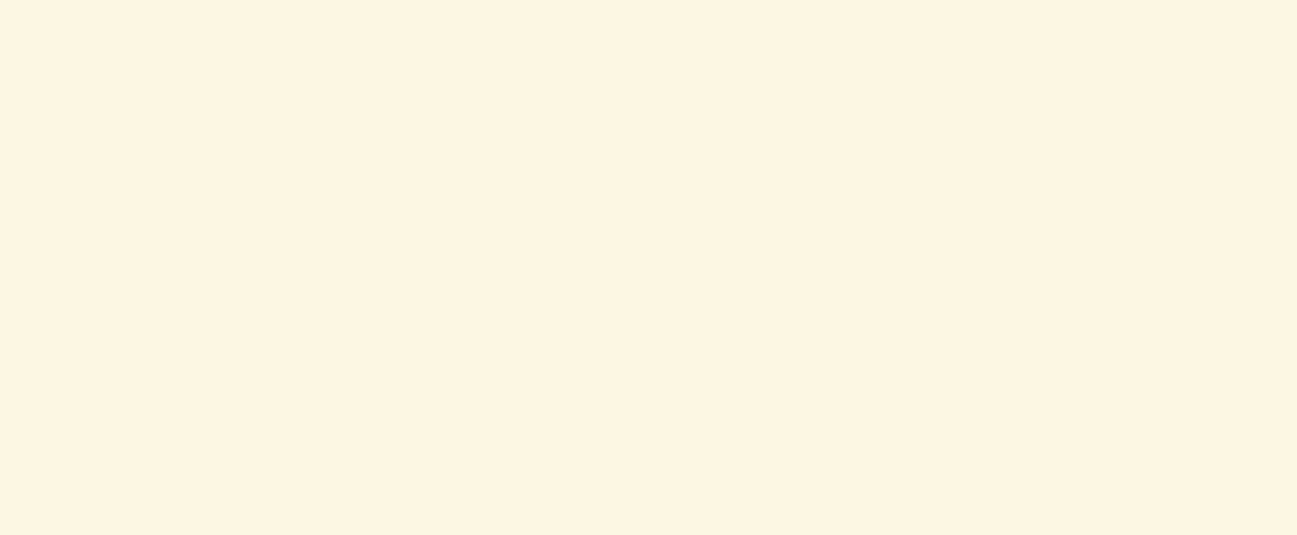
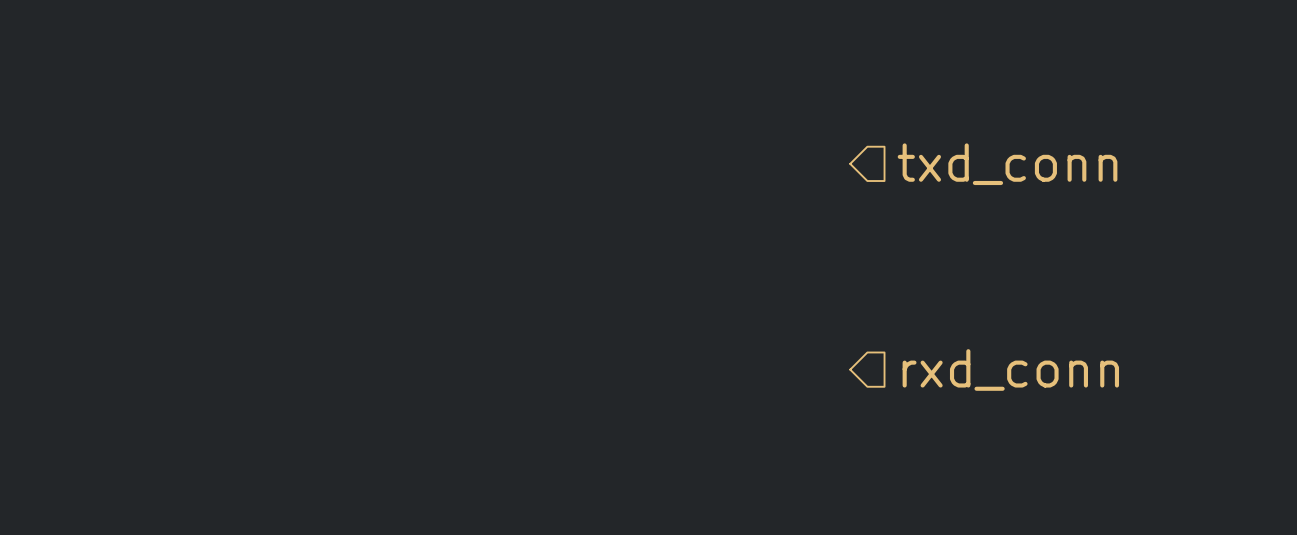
hierarchical label: none -> txd_conn (1007, 164)
hierarchical label: none -> rxd_conn (1010, 369)

